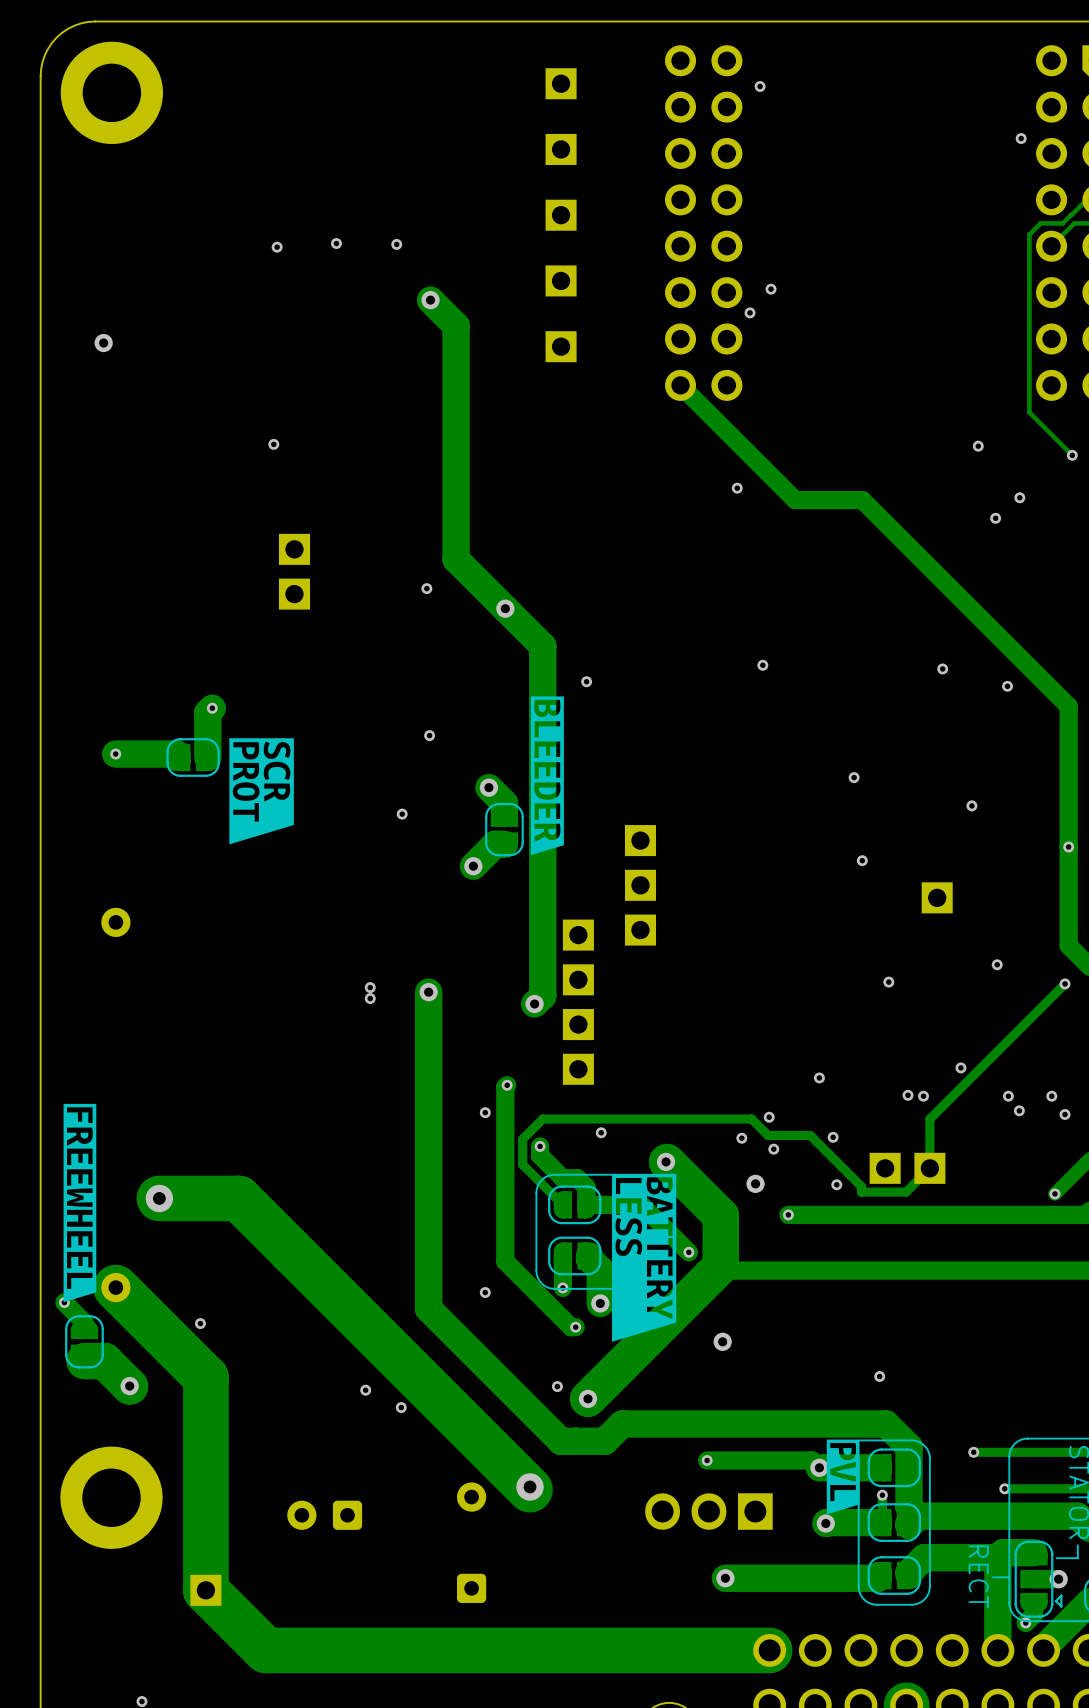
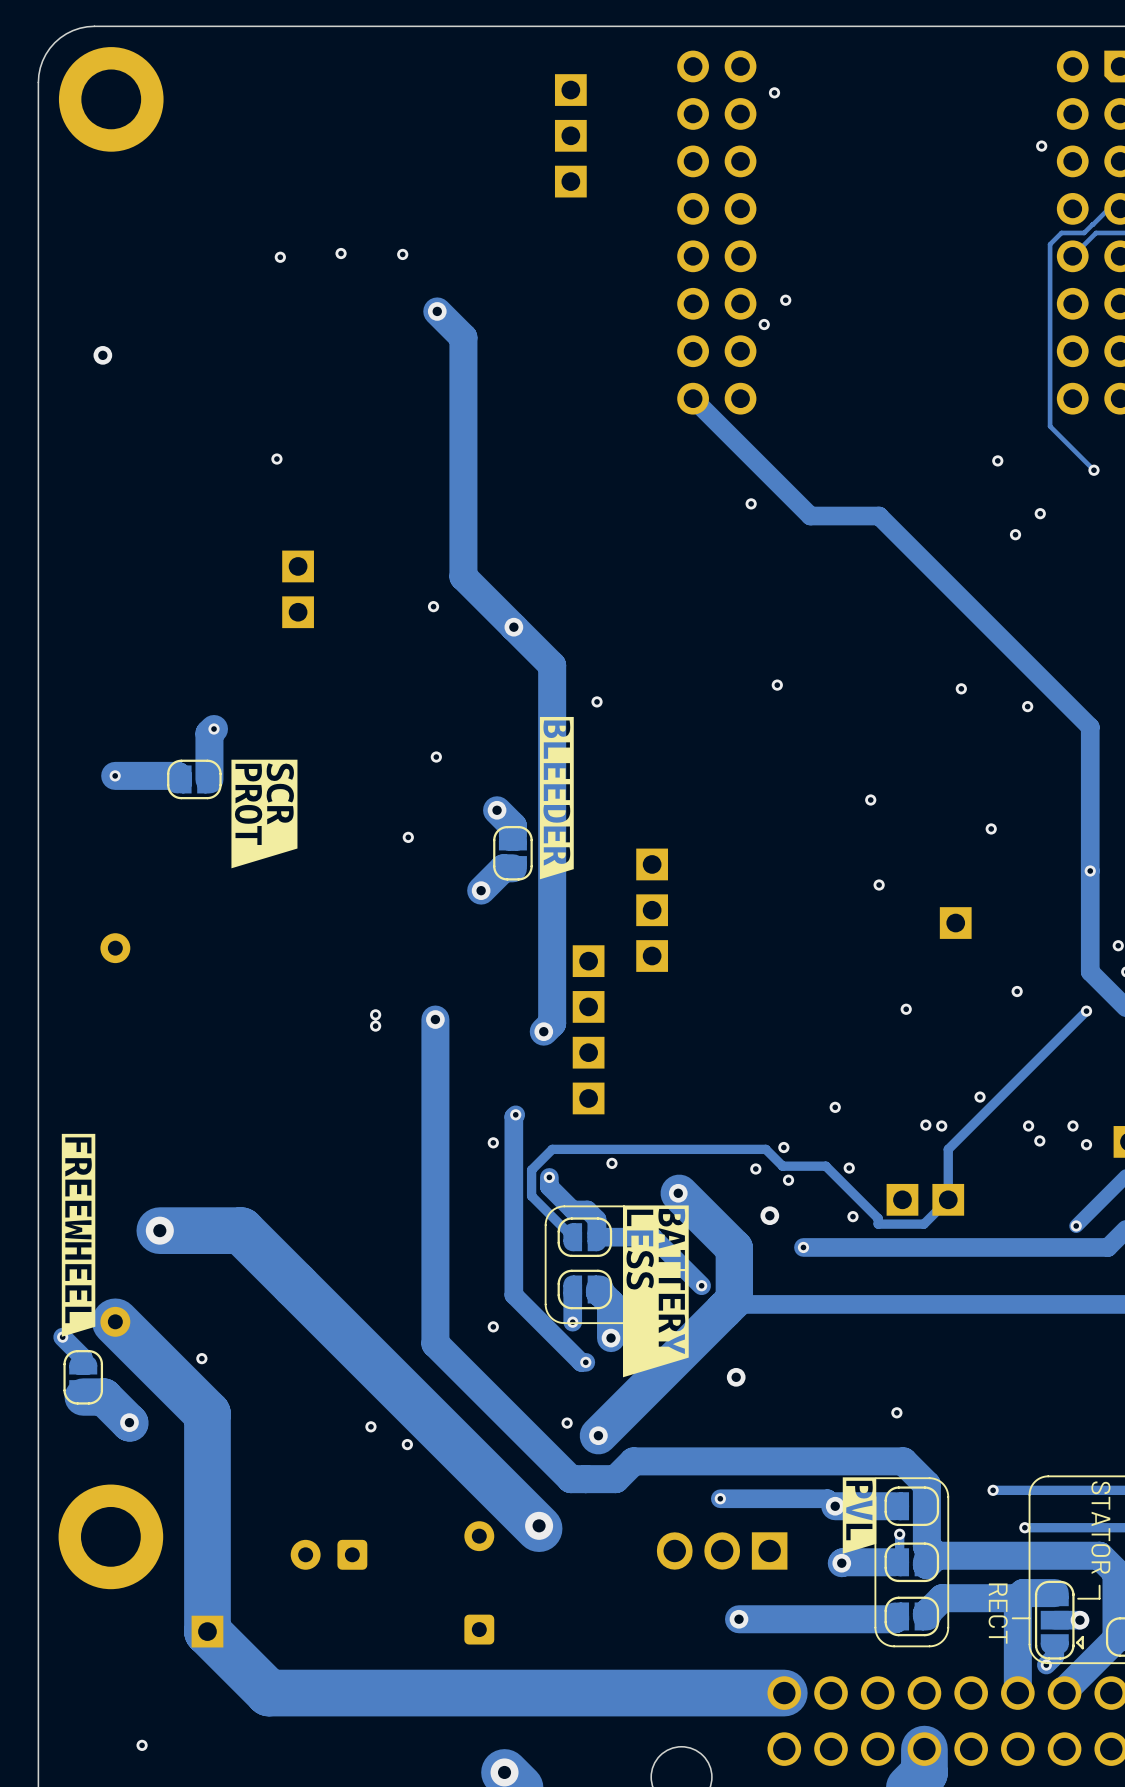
part: none -> (570, 135)
part: (561, 149) -> none
part: none -> (570, 181)
part: (561, 215) -> none
part: (561, 280) -> none
part: (561, 346) -> none

